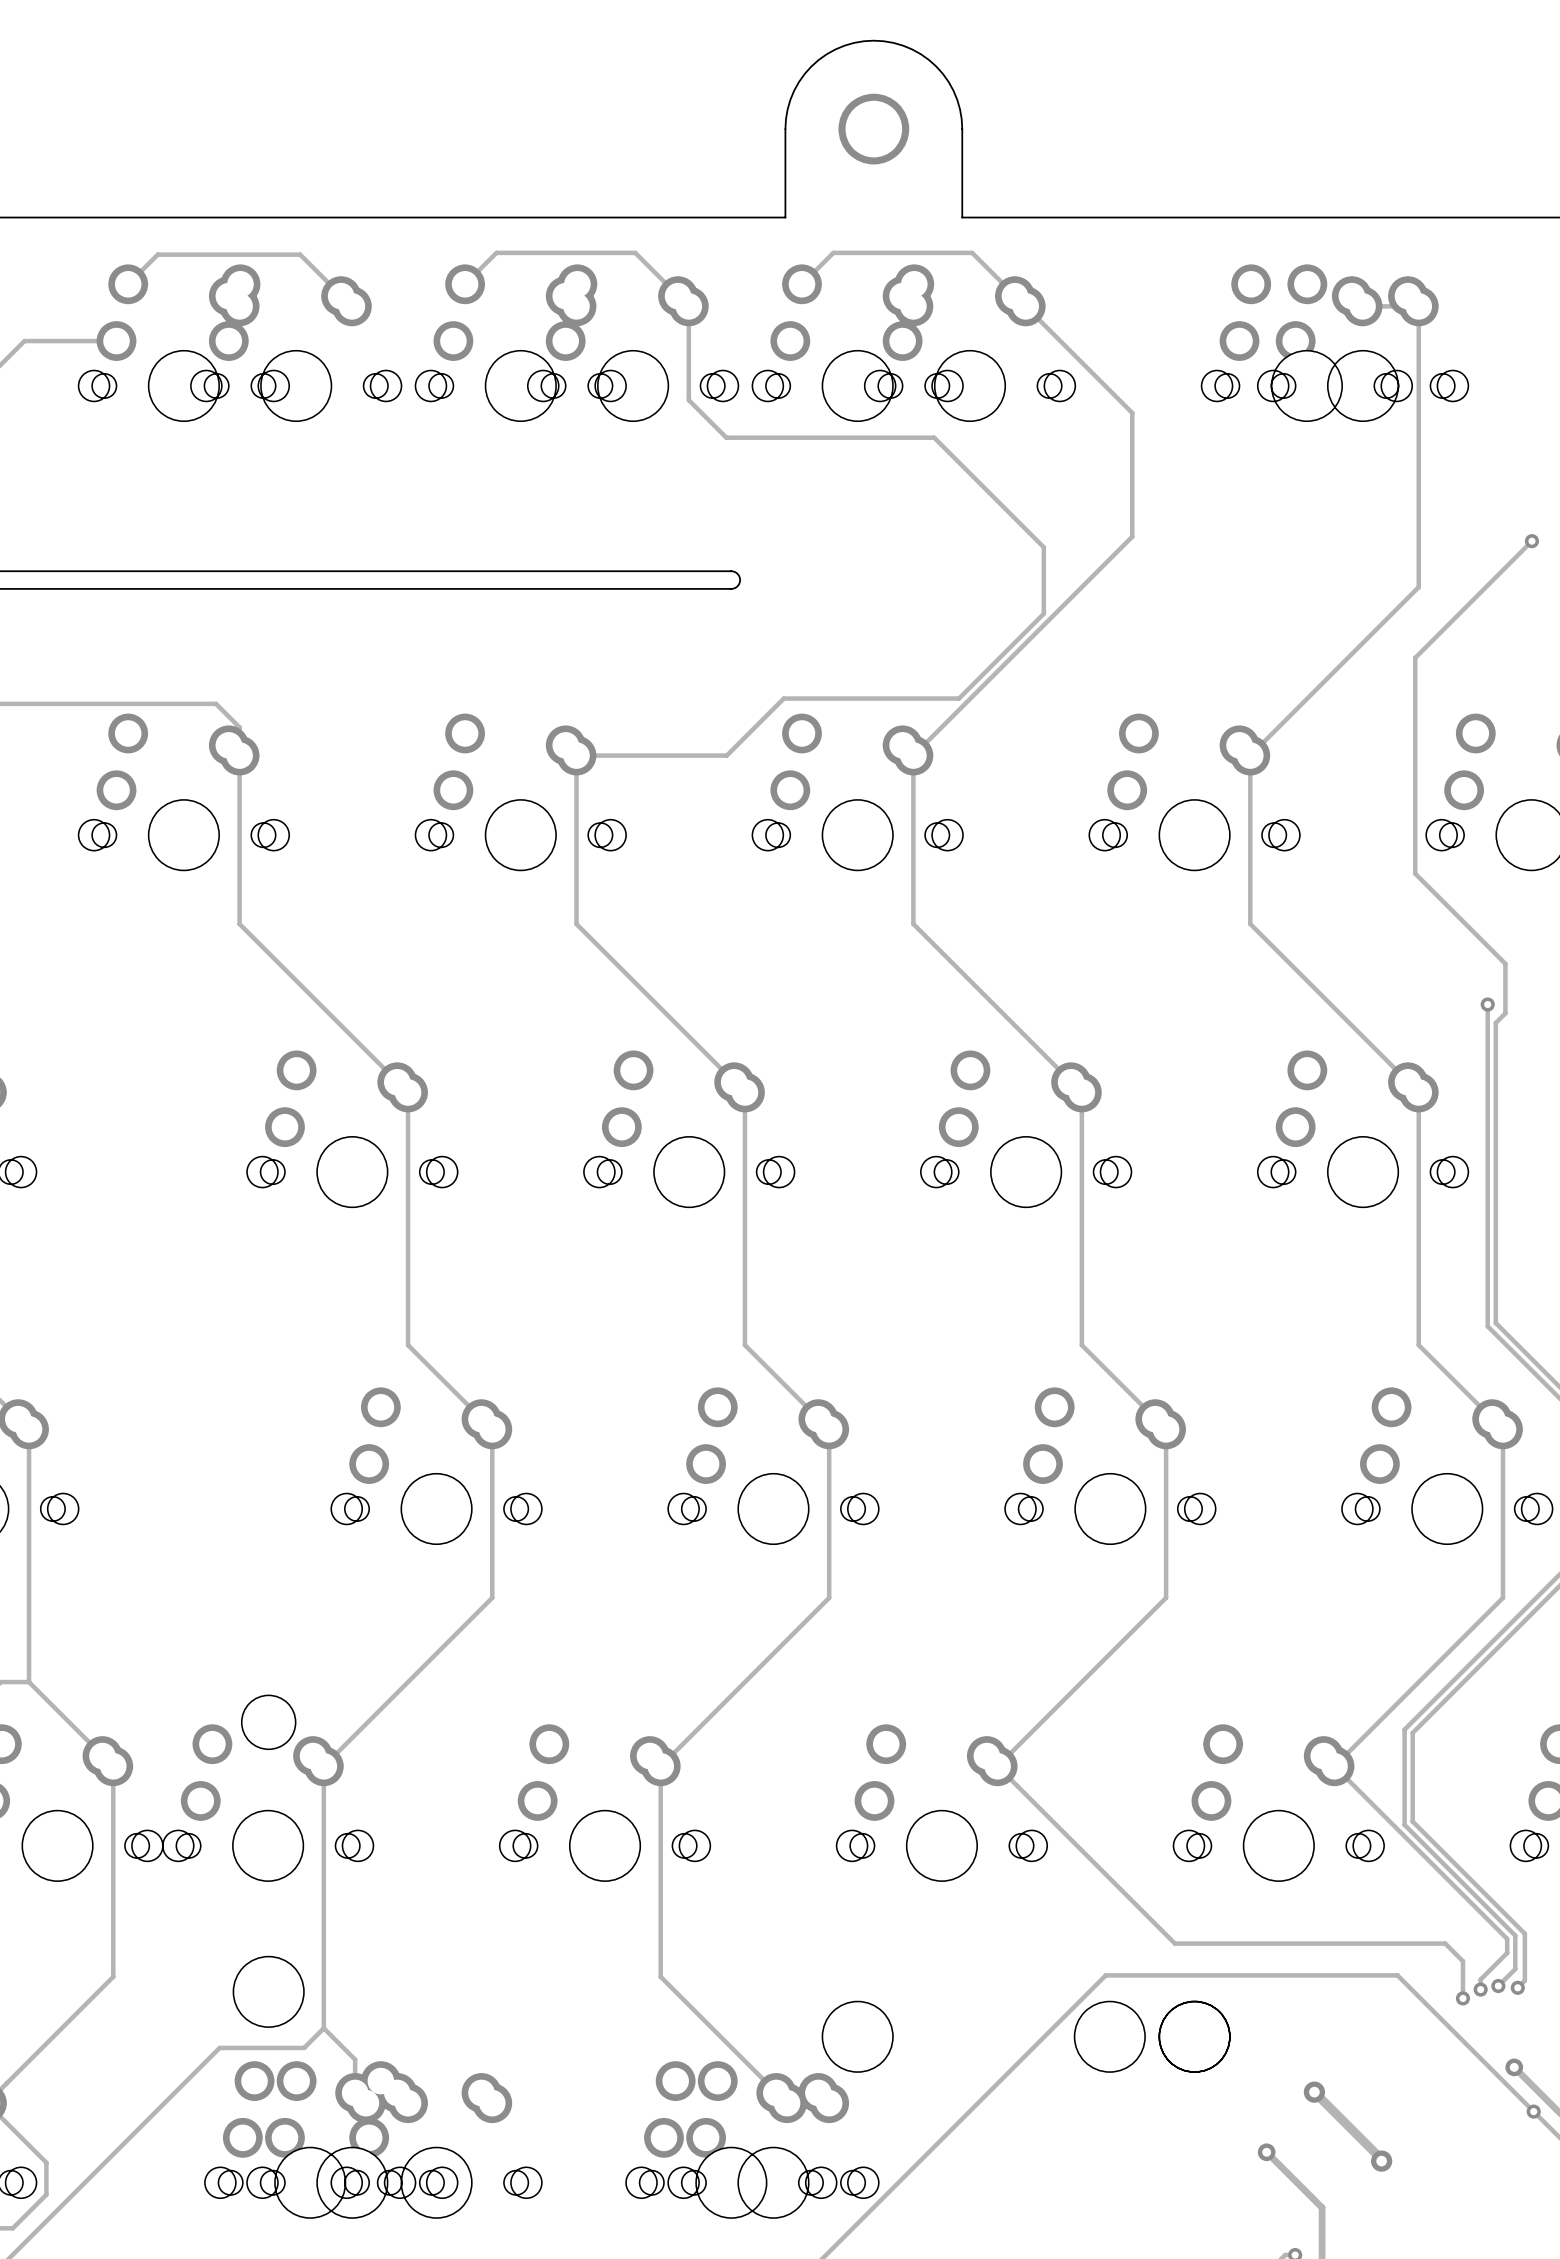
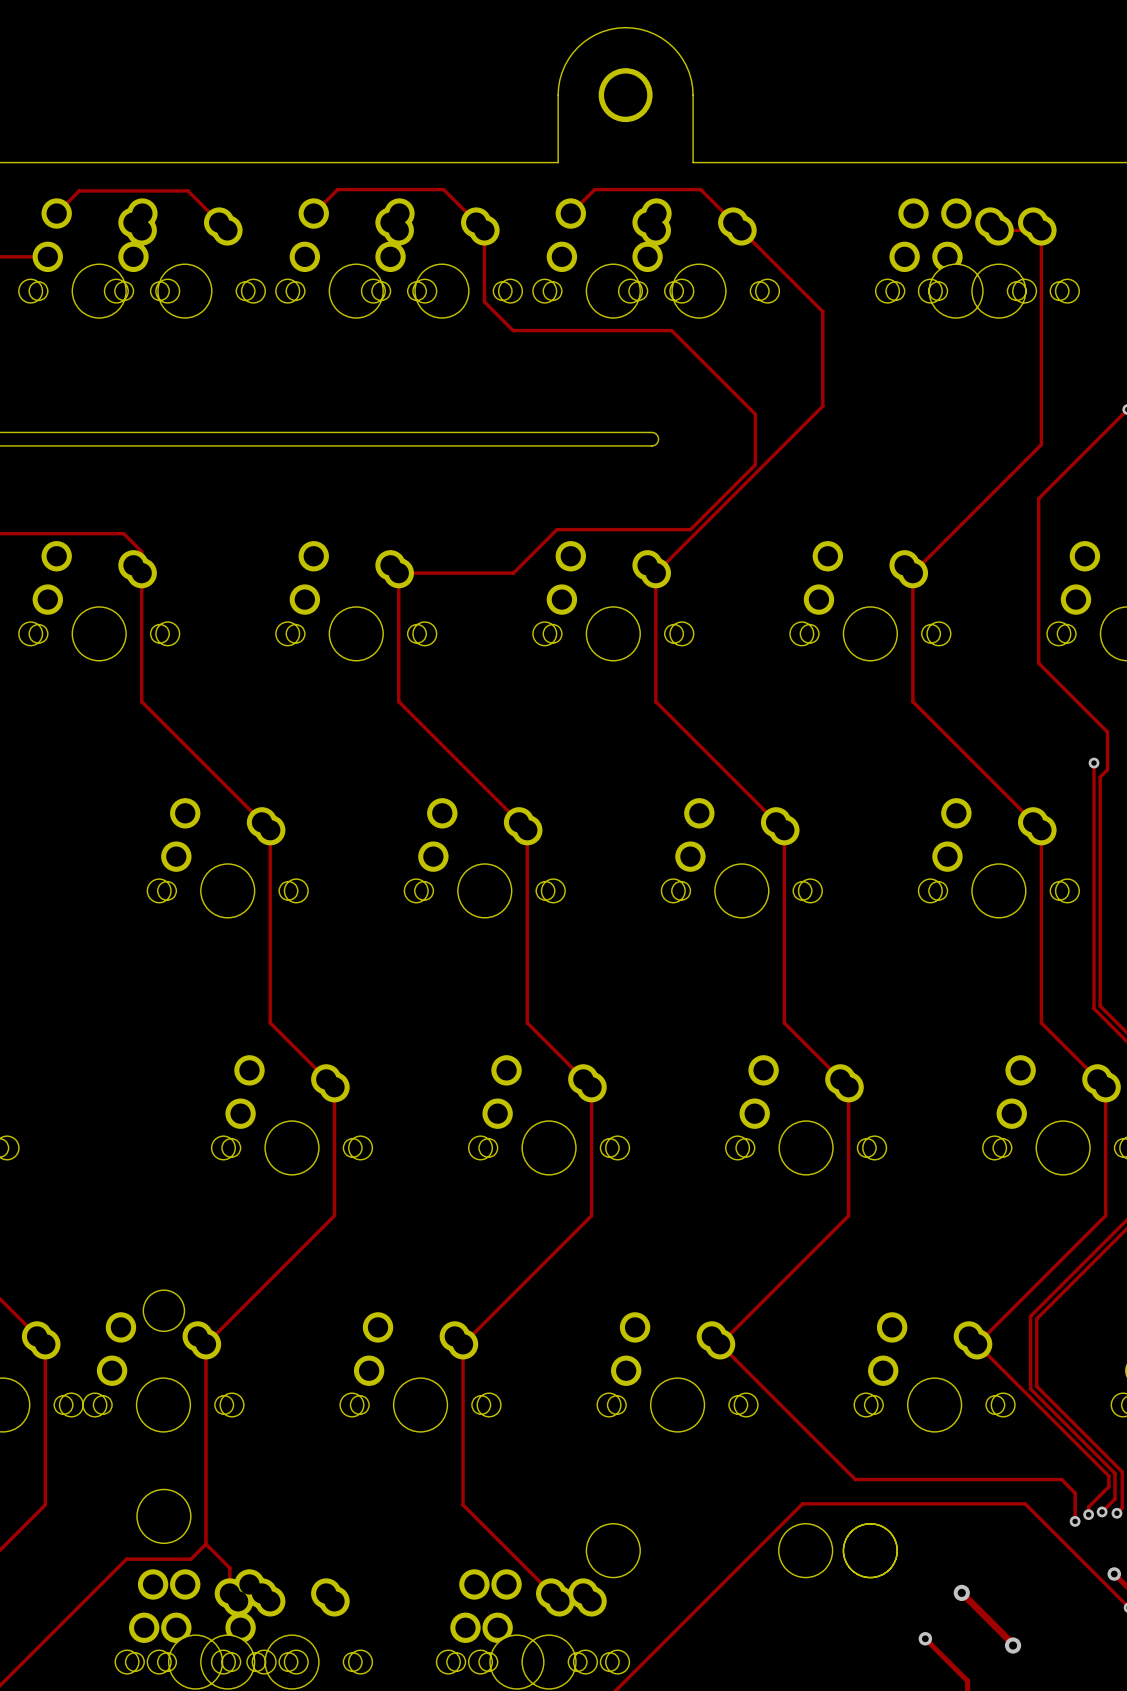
board edge: (731, 571) (737, 573) (740, 580) (737, 586) (731, 588) -> (516, 432) (651, 432) (656, 434) (658, 439) (656, 443) (651, 445) (516, 445)

